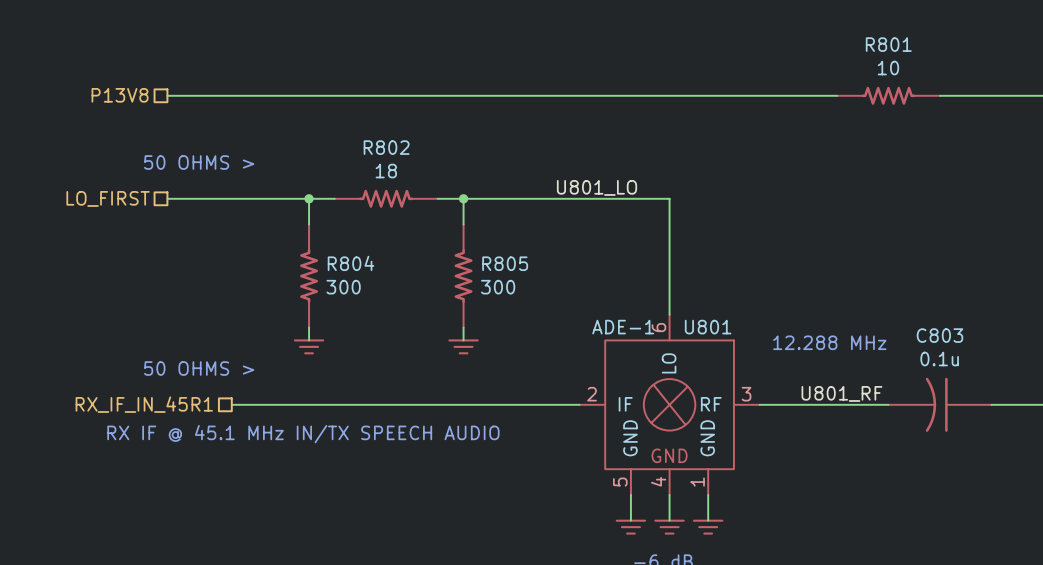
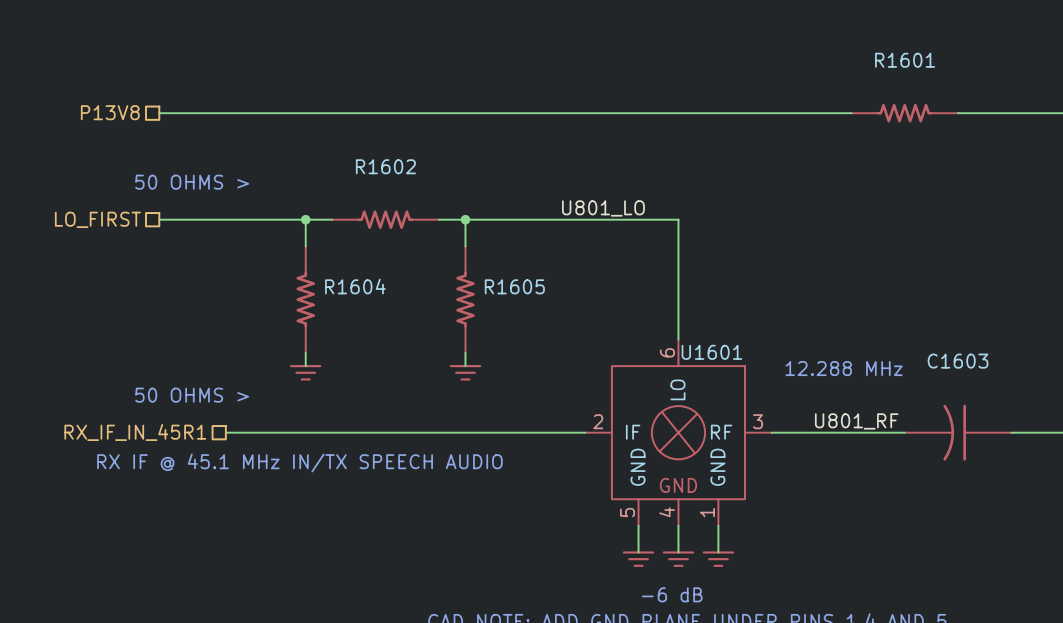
R801 name: R801 (888, 44) -> R1601 (905, 60)
R801 value: 10 (888, 68) -> none
R802 name: R802 (386, 147) -> R1602 (385, 166)
R802 value: 18 (386, 171) -> none
R804 name: R804 (350, 263) -> R1604 (355, 286)
R805 name: R805 (505, 263) -> R1605 (514, 286)
R804 value: 300 (343, 287) -> none
R805 value: 300 (498, 287) -> none
U801 value: ADE-1 (623, 327) -> none
U801 name: U801 (708, 327) -> U1601 (711, 352)
C803 name: C803 (939, 335) -> C1603 (958, 361)
C803 value: 0.1u (939, 359) -> none

